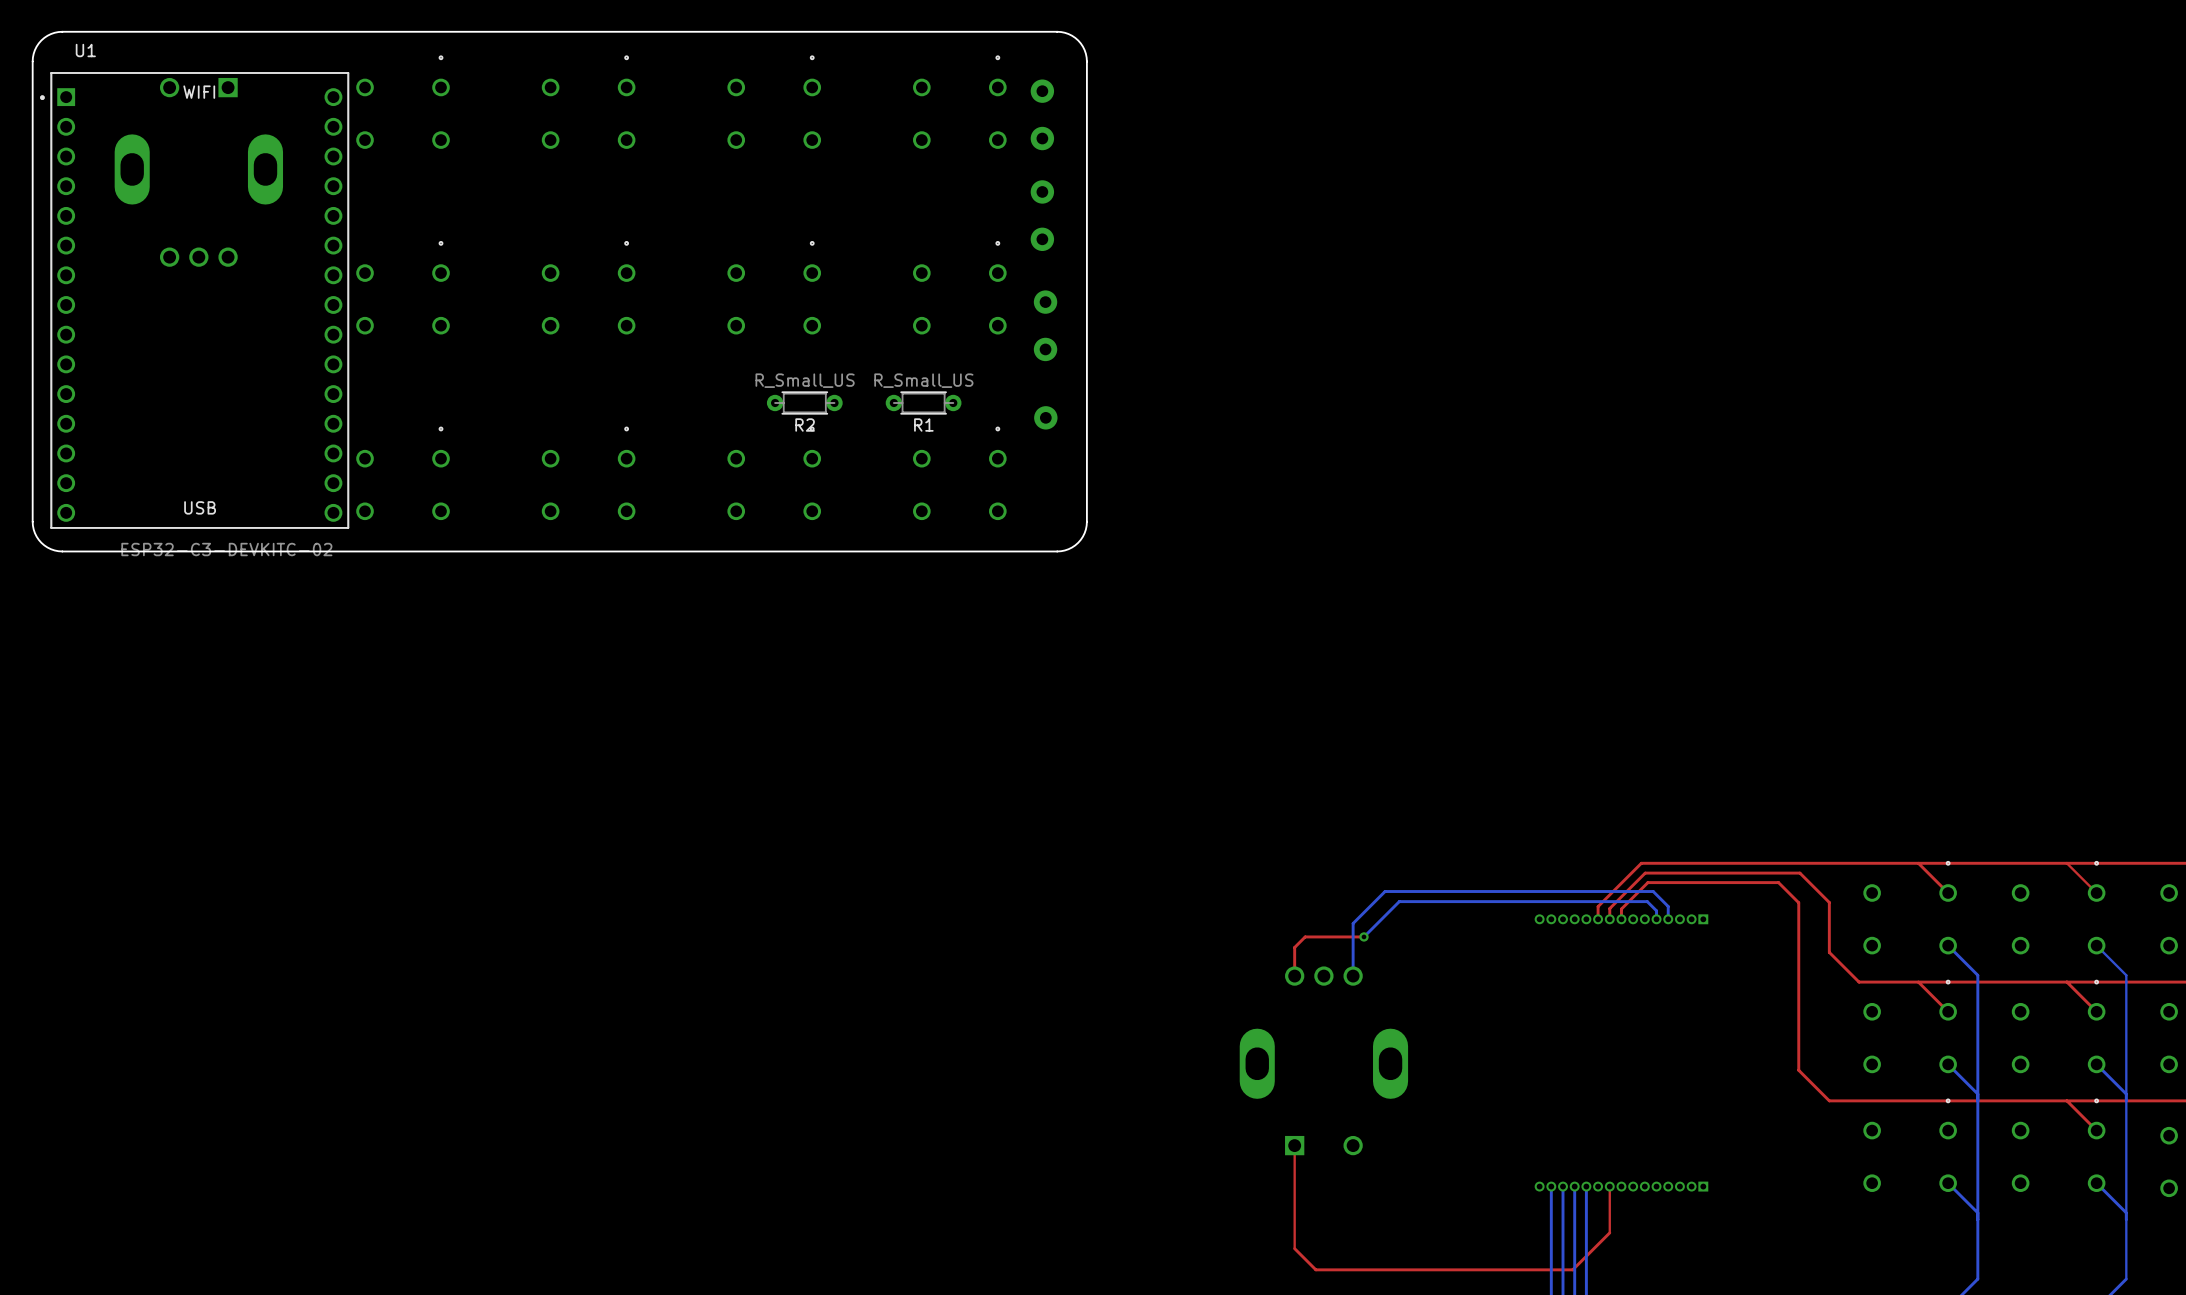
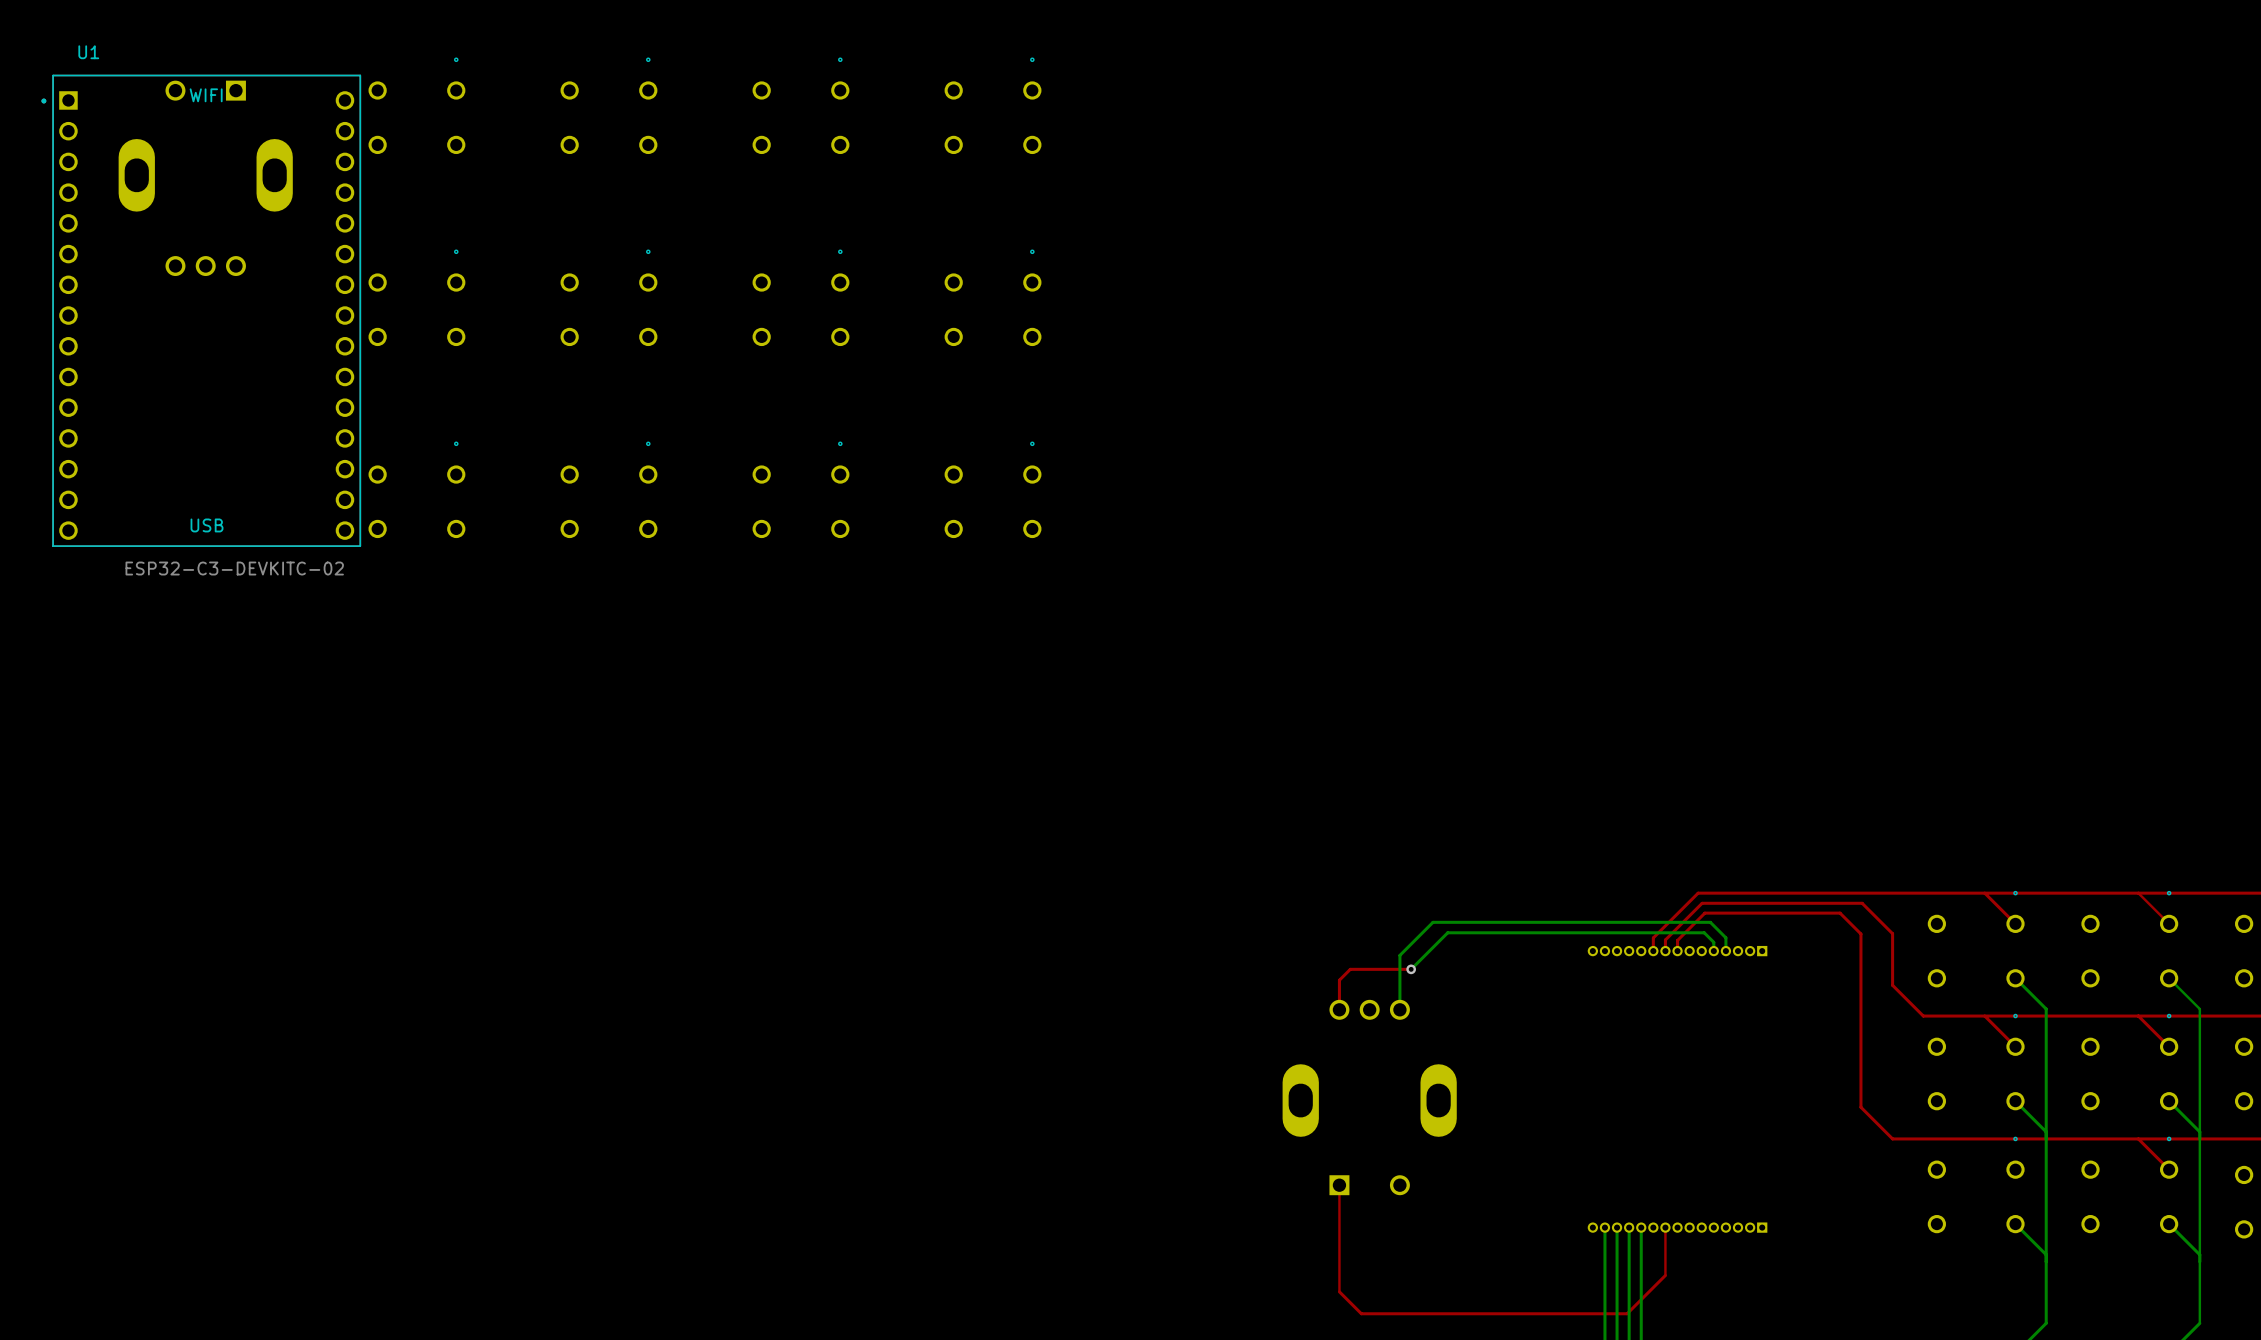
board edge: (1057, 31) (62, 31) (51, 34) (38, 43) (33, 53) (32, 61) (32, 521) (34, 533) (44, 545) (54, 550) (62, 551) (1057, 551) (1068, 549) (1080, 539) (1085, 529) (1086, 521) (1086, 61) (1084, 50) (1078, 40) (1068, 34) (1057, 31) -> none
part: (1042, 91) -> none
part: (1042, 138) -> none
part: (1042, 191) -> none
part: (1042, 239) -> none
part: (1045, 302) -> none
part: (1045, 349) -> none
R2: R_Small_US (804, 402) -> none
R1: R_Small_US (923, 402) -> none
part: (1045, 417) -> none

